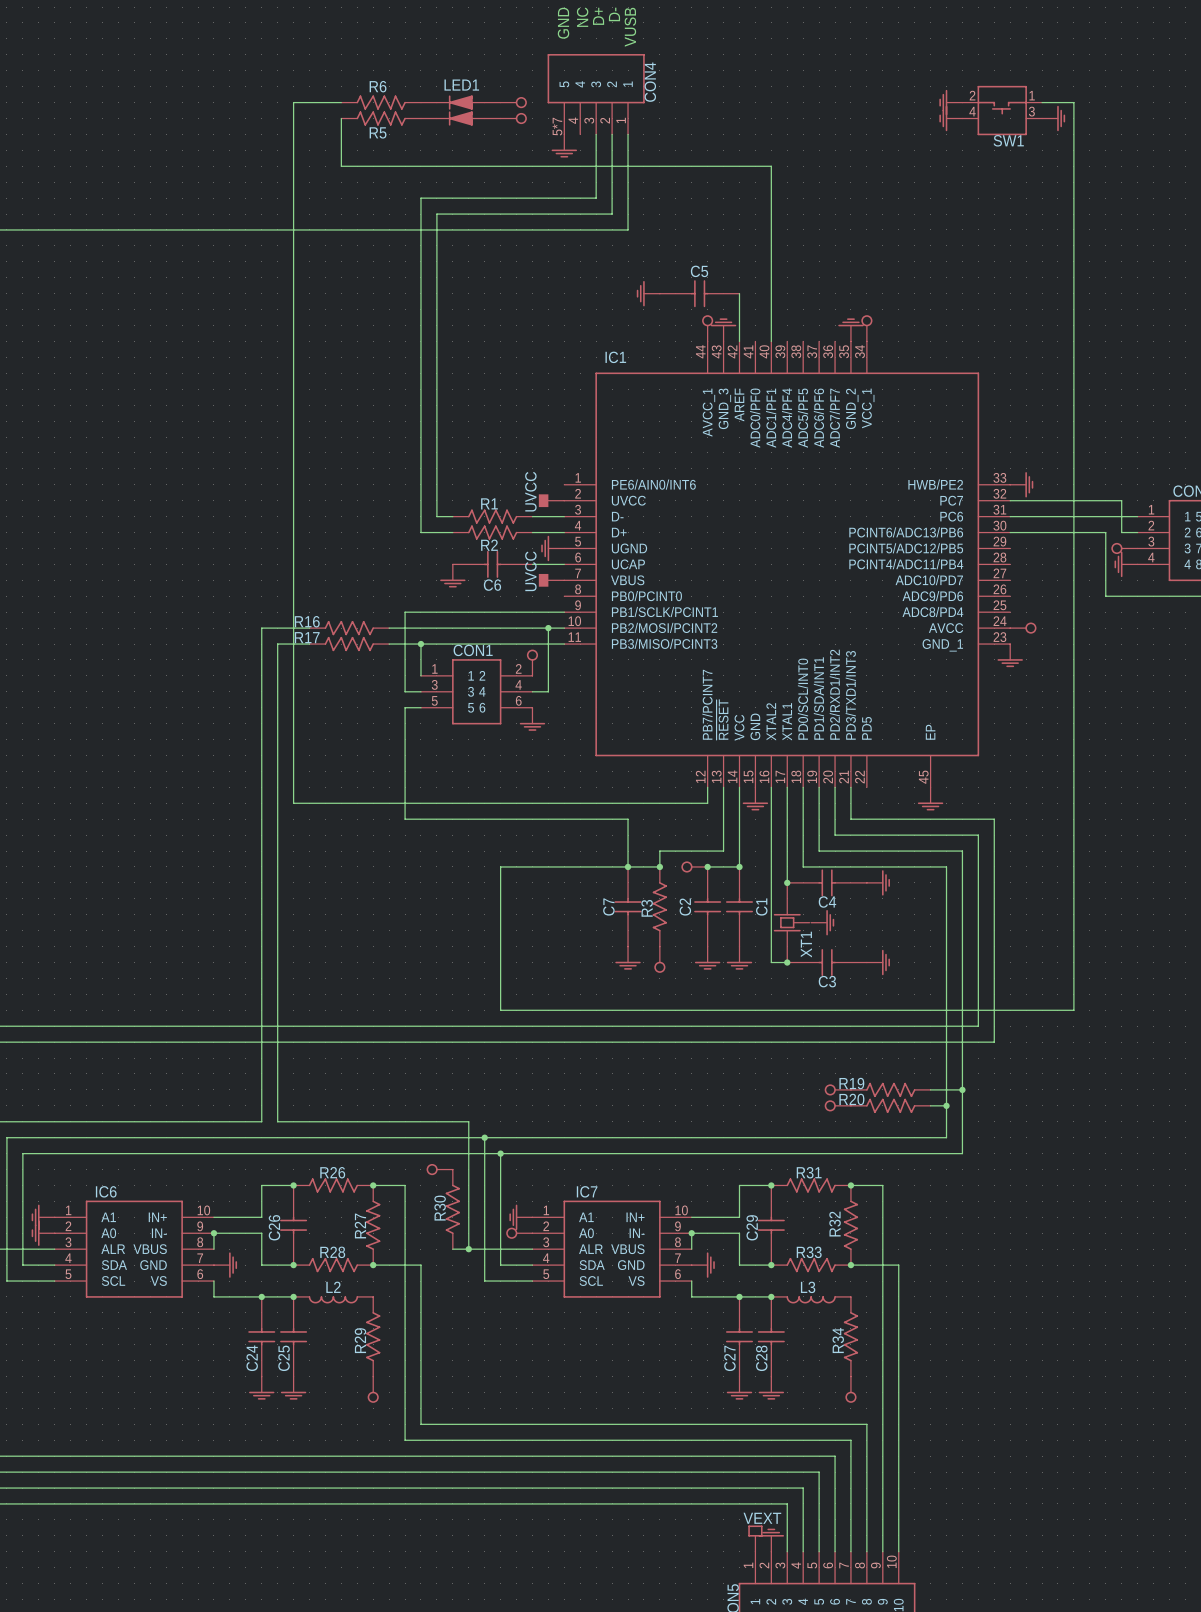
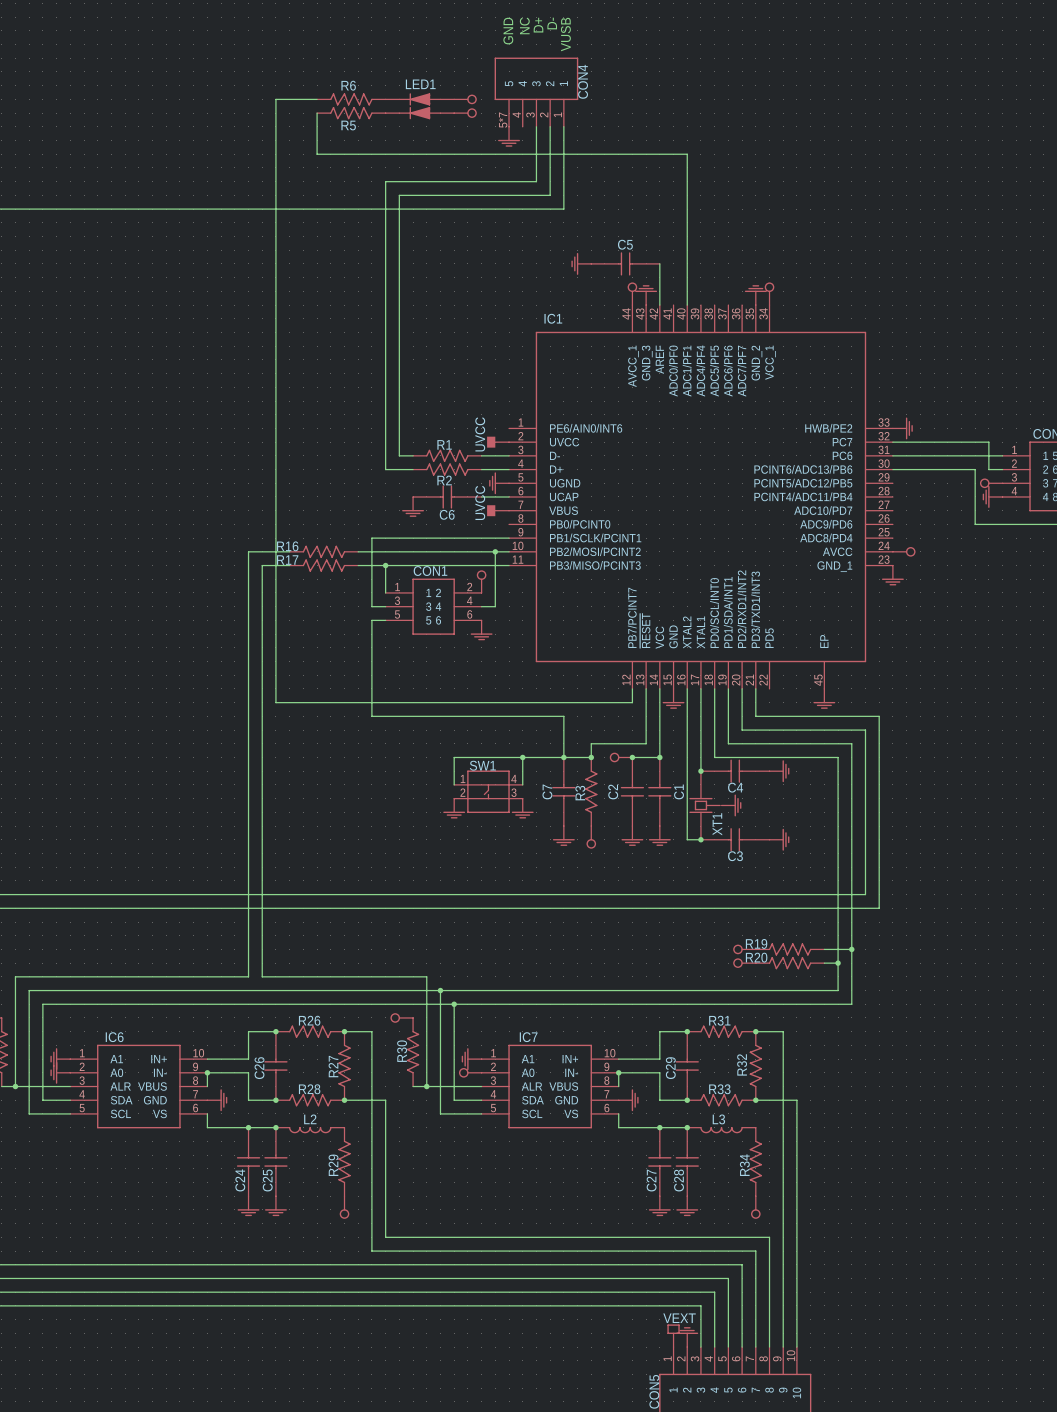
SW1 symbol: [962, 85, 1043, 136] -> [454, 770, 523, 814]
power symbol: (950, 102) -> none
wire: (1042, 102) (1073, 102) (1073, 1010) (500, 1010) (500, 898) -> none
power symbol: (950, 118) -> none
power symbol: (1053, 118) -> none
SW1 name position: SW1 (1008, 140) -> SW1 (482, 765)
wire: none -> (522, 757) (522, 784)
junction: none -> (522, 757)
power symbol: none -> (454, 808)
power symbol: none -> (522, 808)

